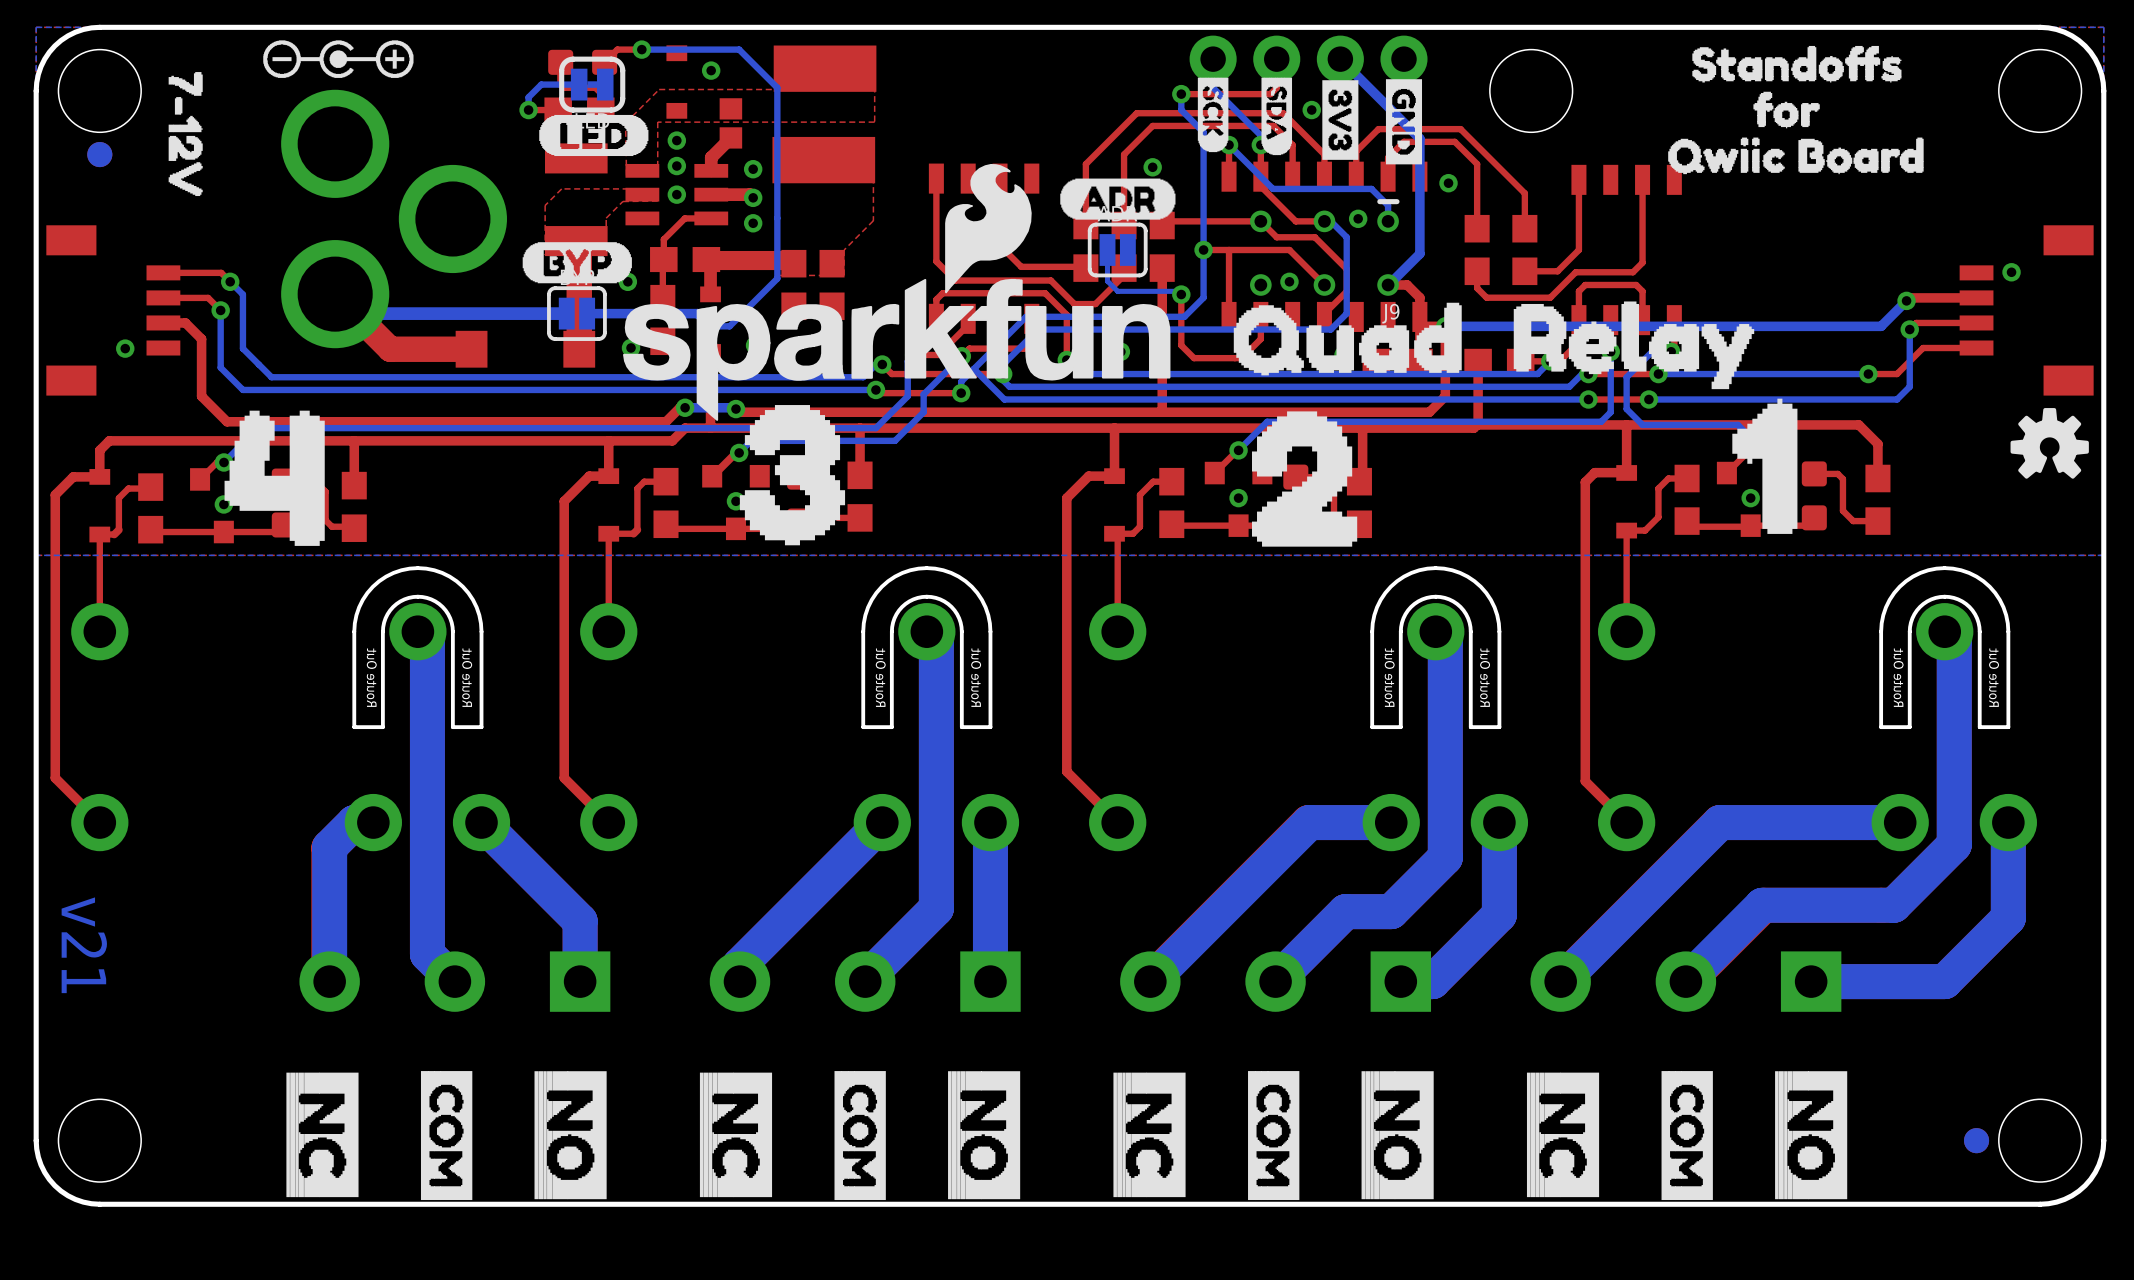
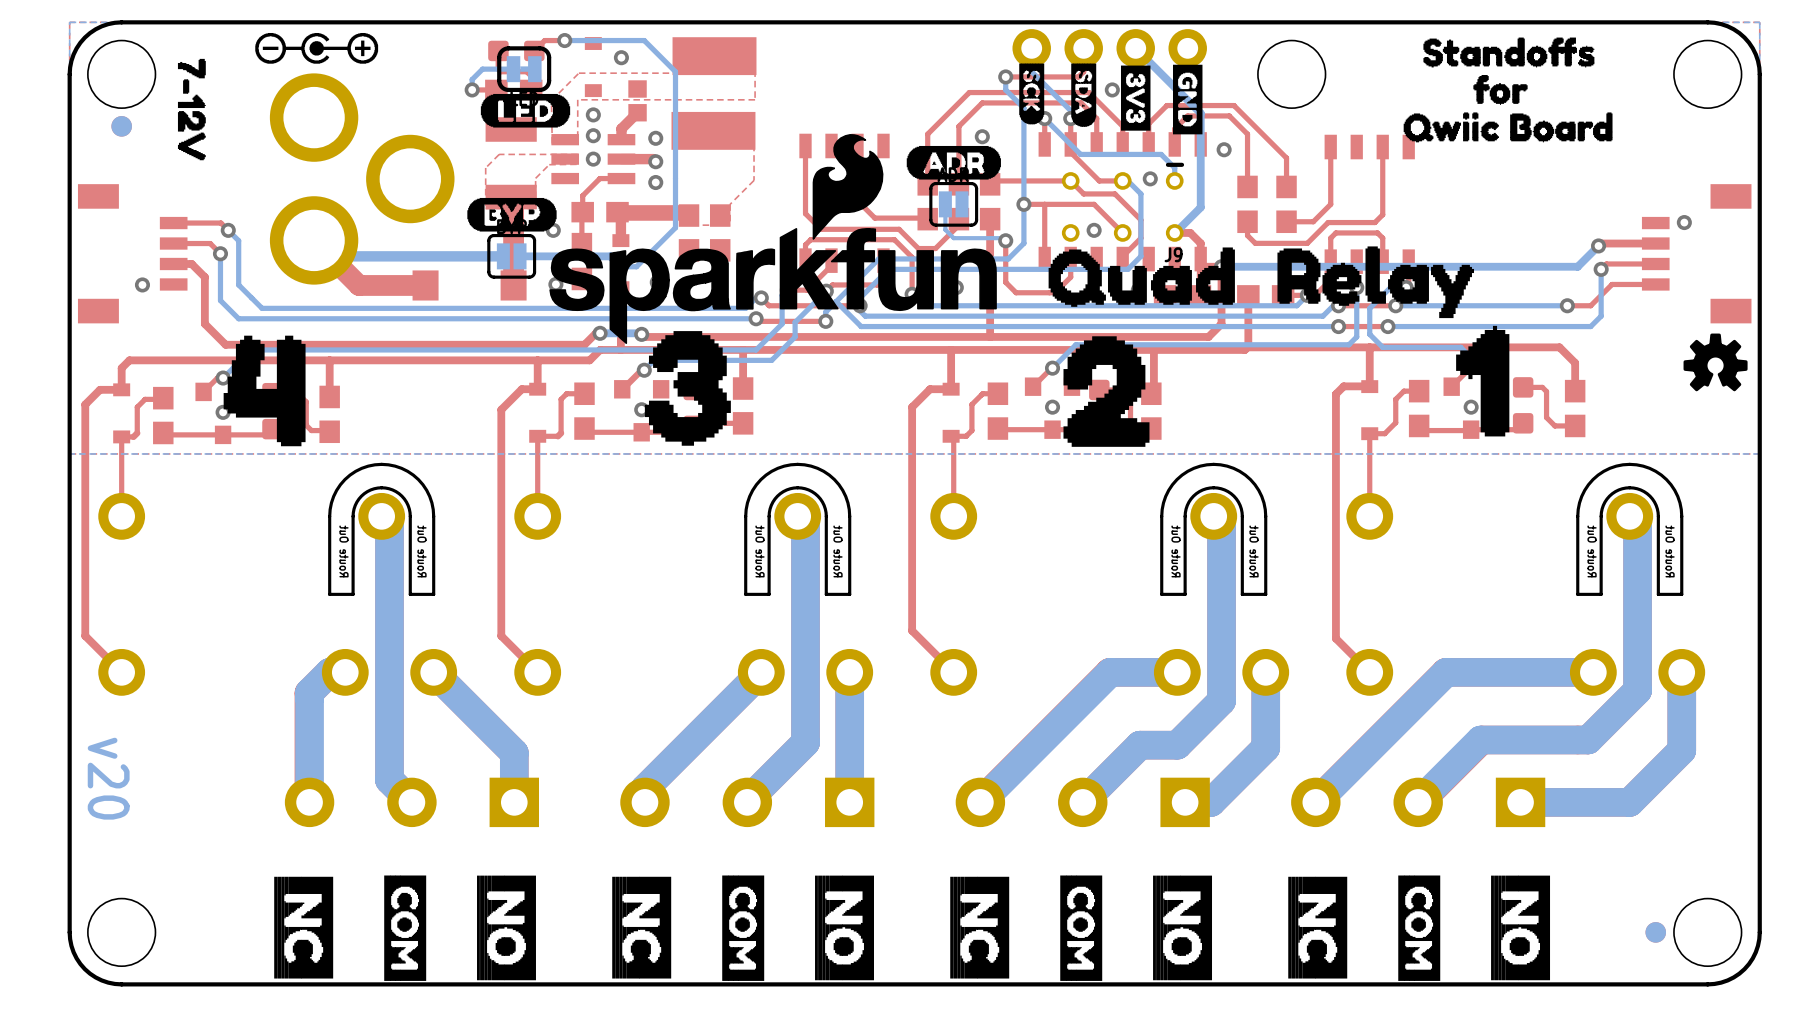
text: v21 (84, 945) -> v20 (108, 778)

